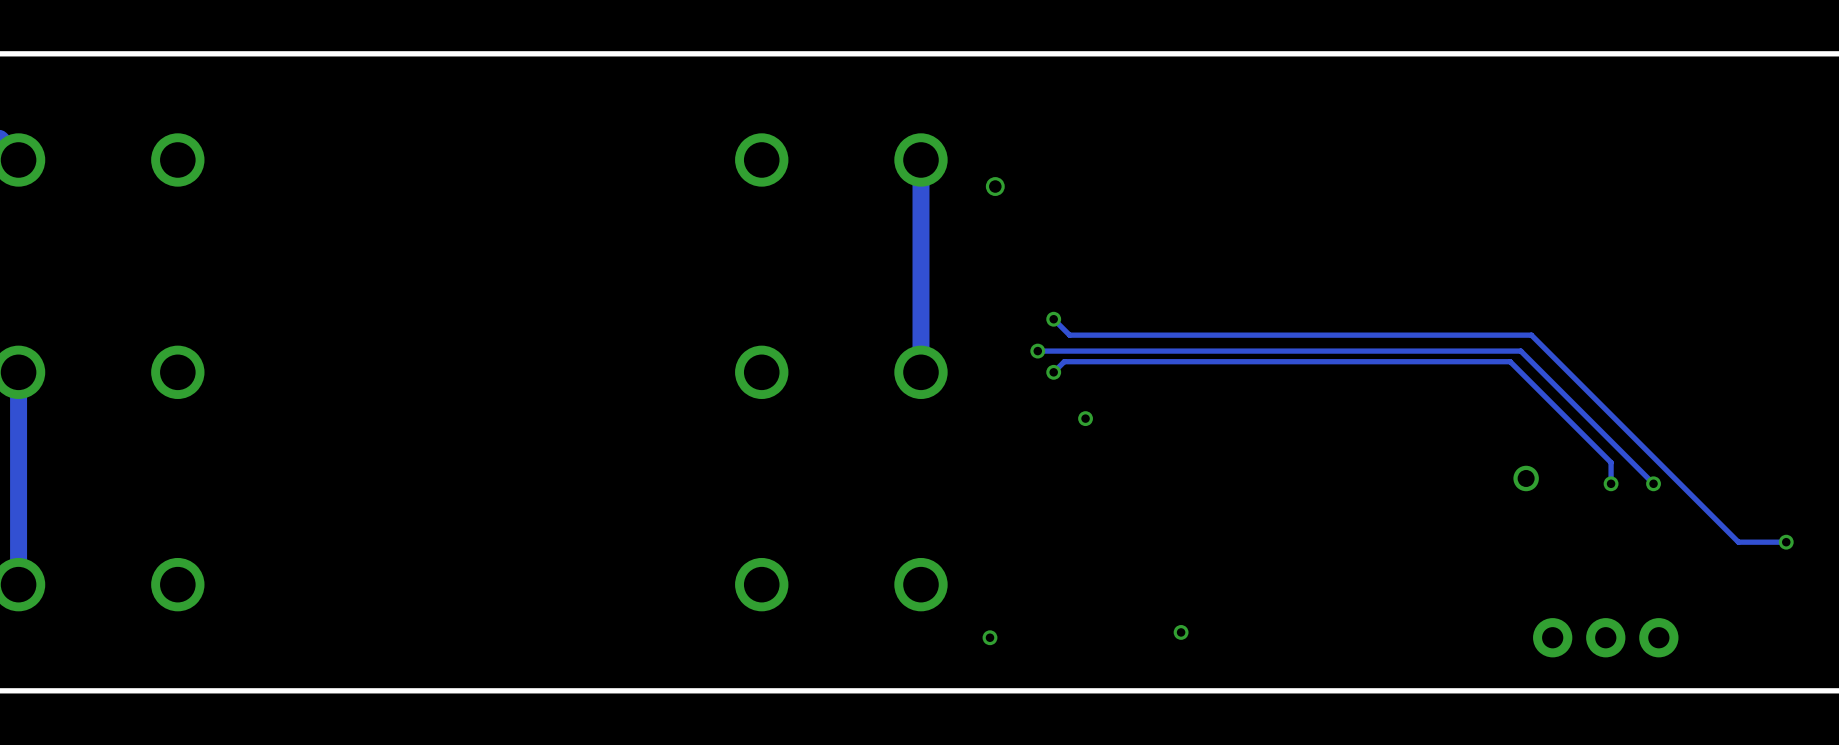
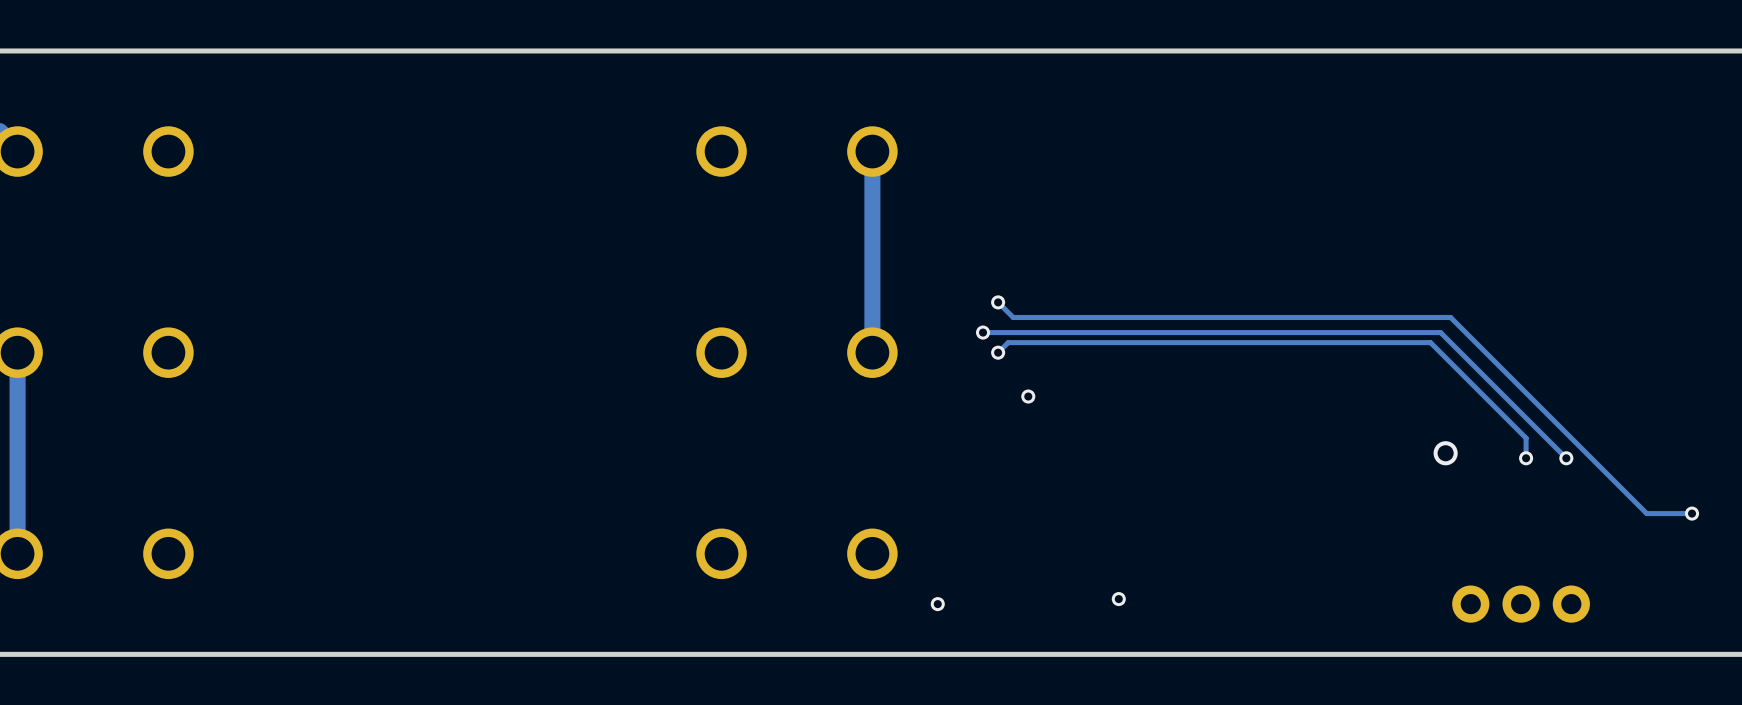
via: (995, 186) -> none

